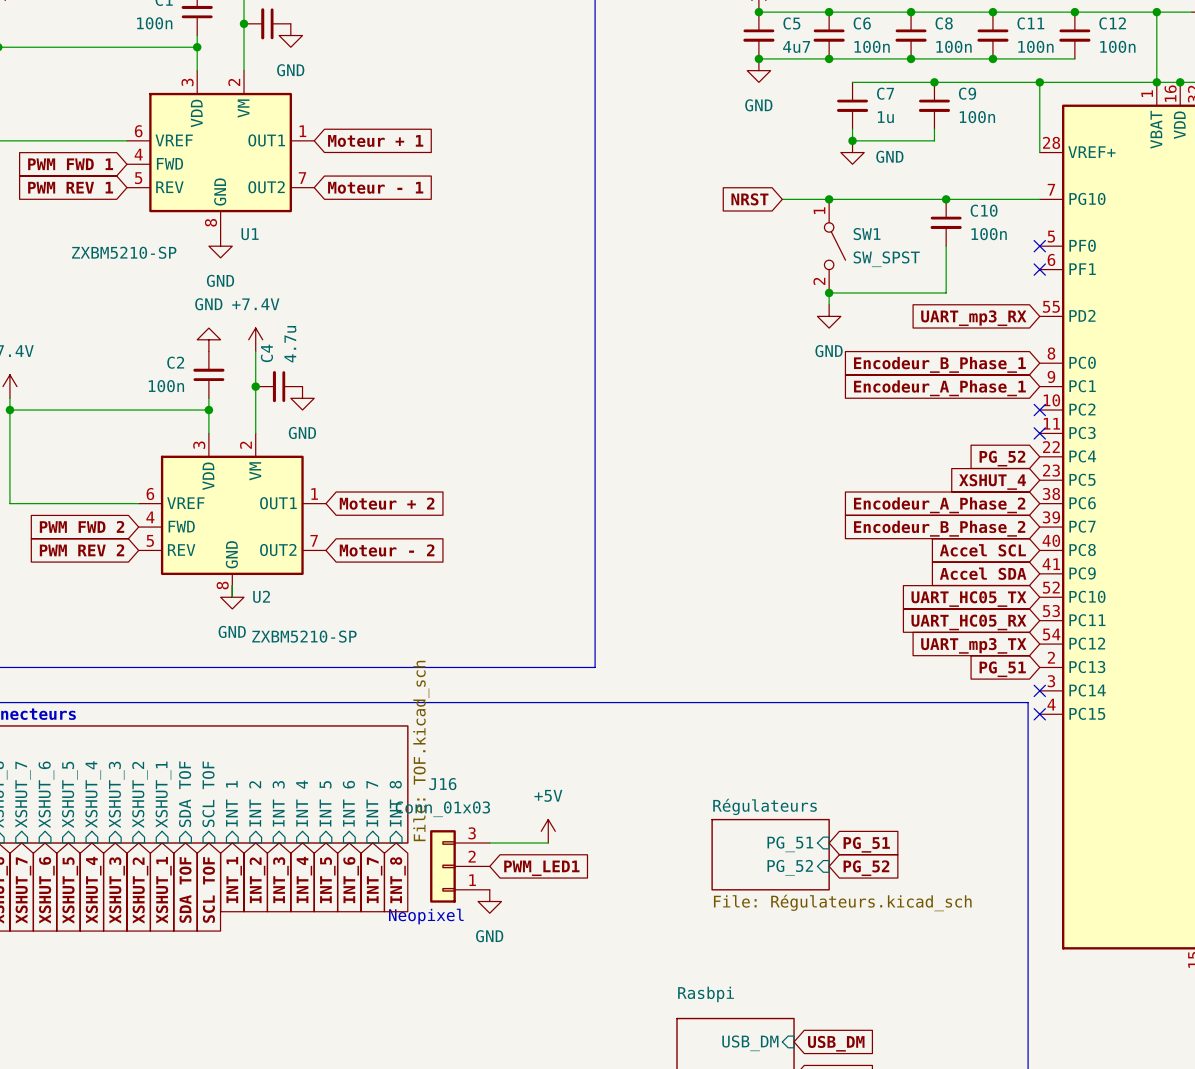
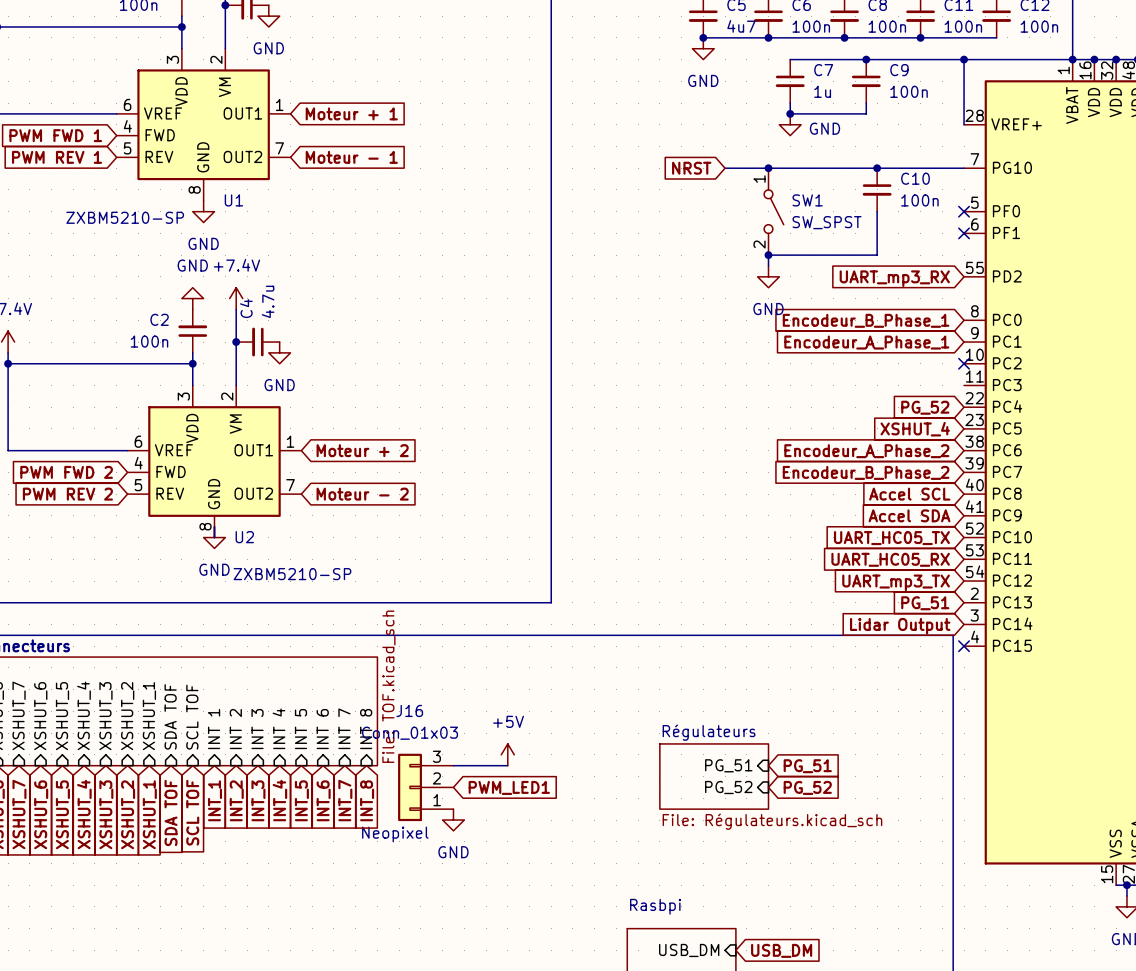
no-connect mark: (1039, 433) -> none
no-connect mark: (1039, 690) -> none
global label: none -> Lidar Output (900, 626)

